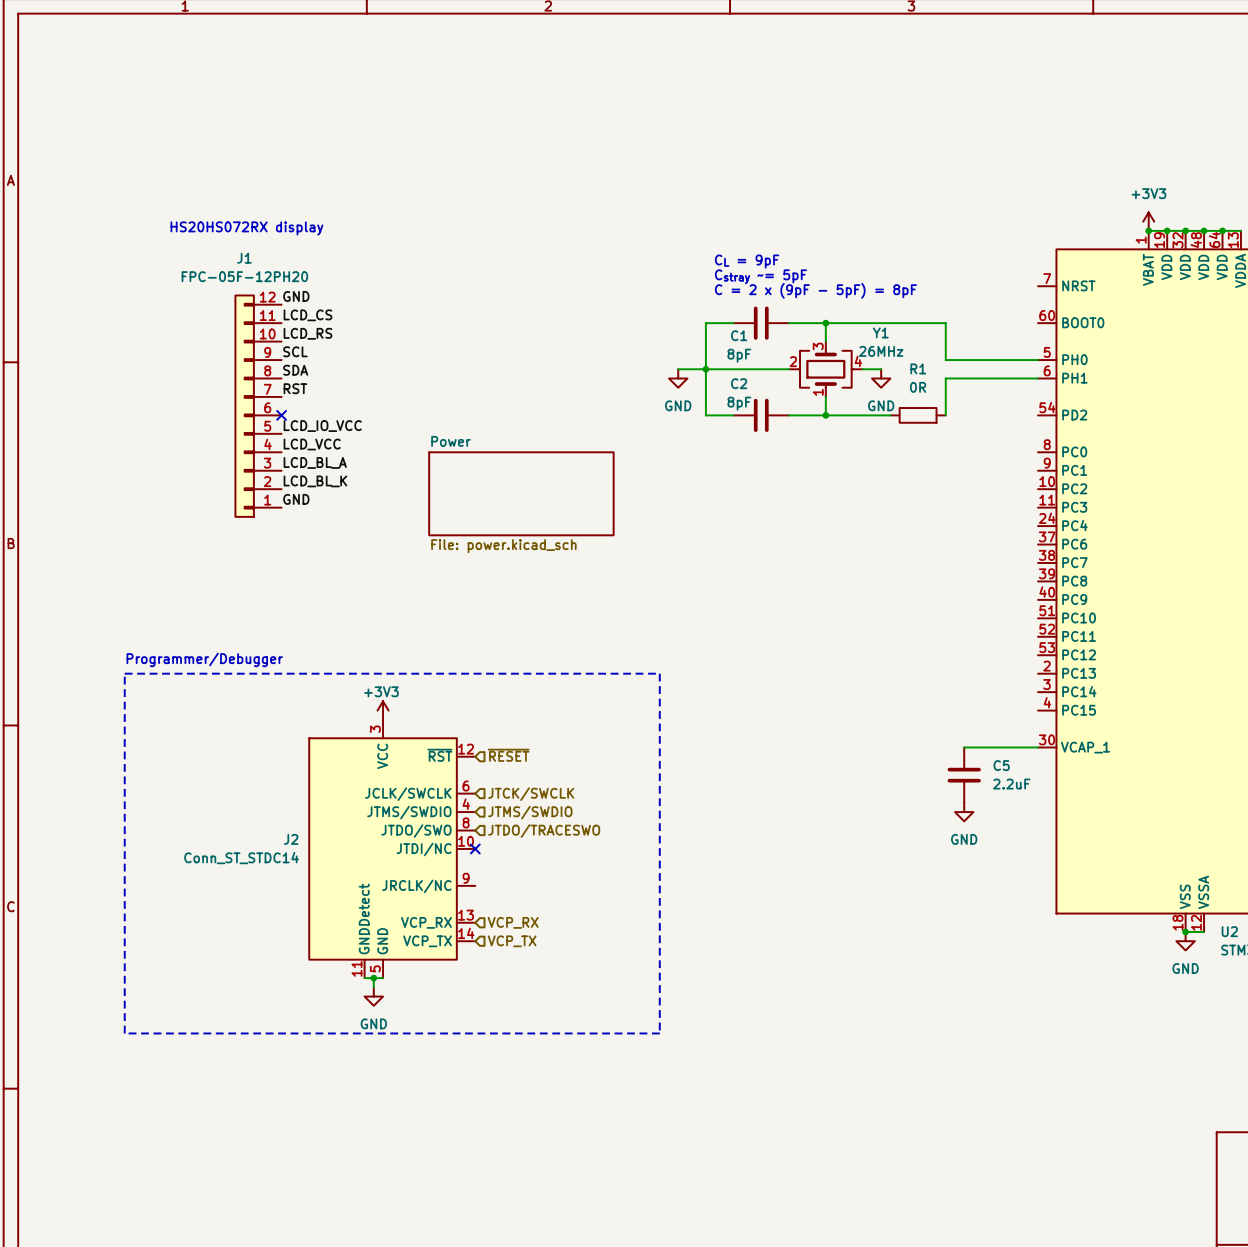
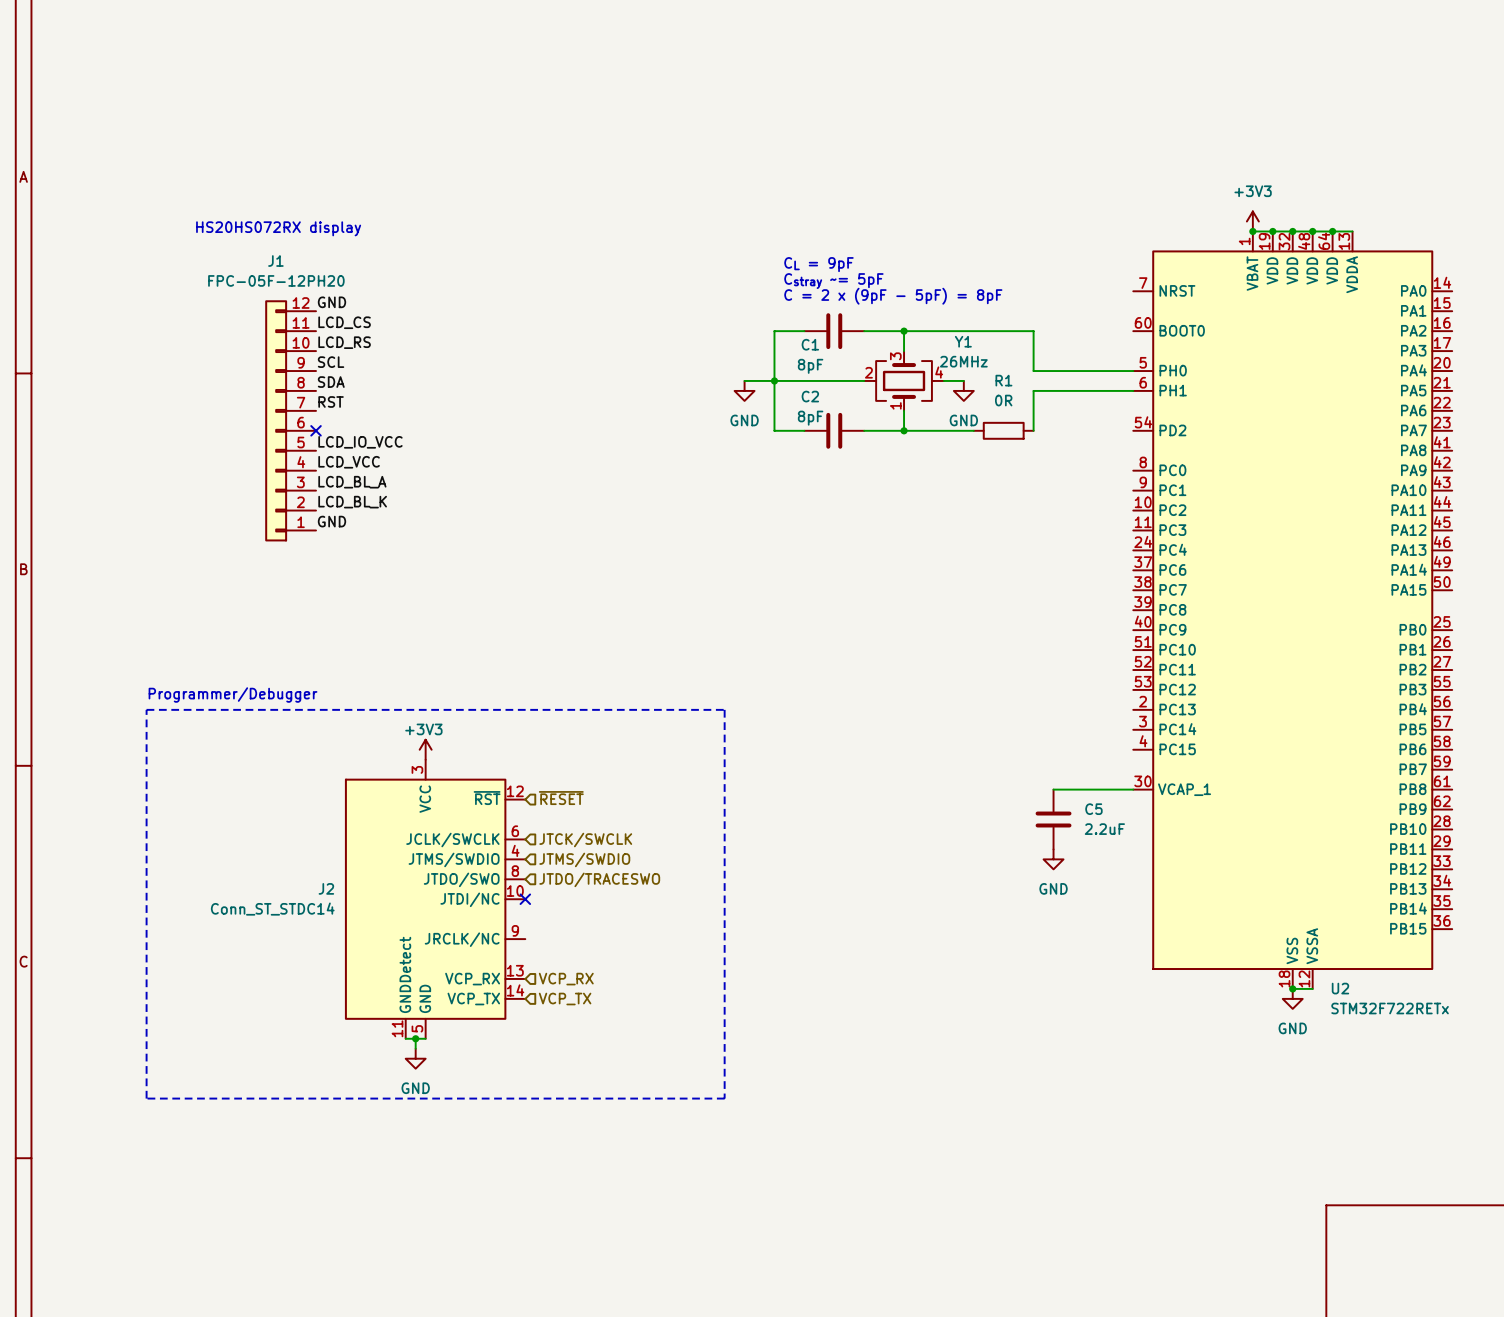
sheet Power: File: power.kicad_sch (521, 493) -> none

